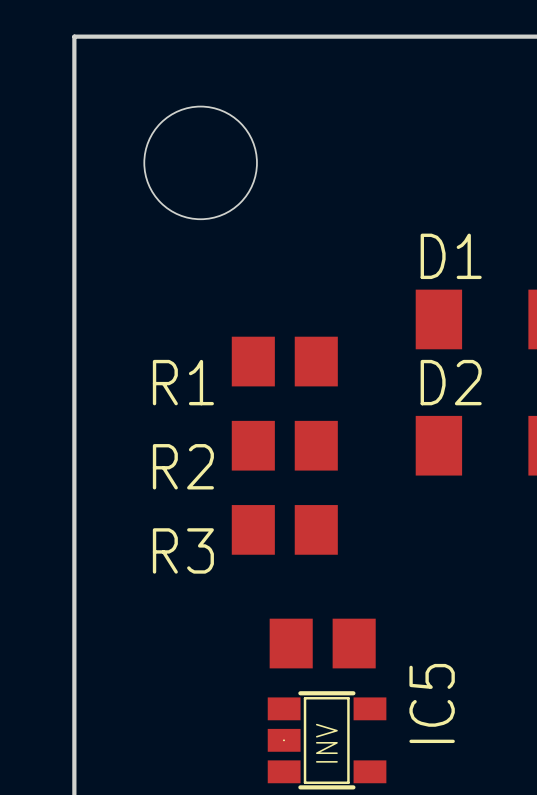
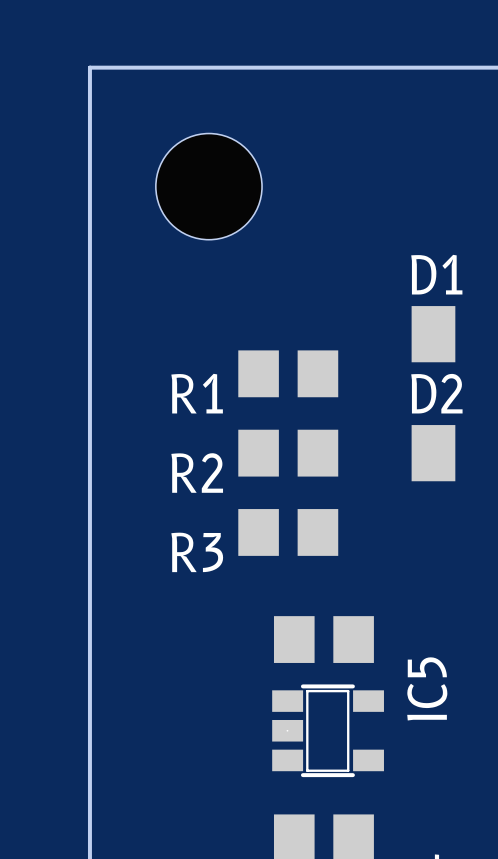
text: INV (326, 743) -> none

